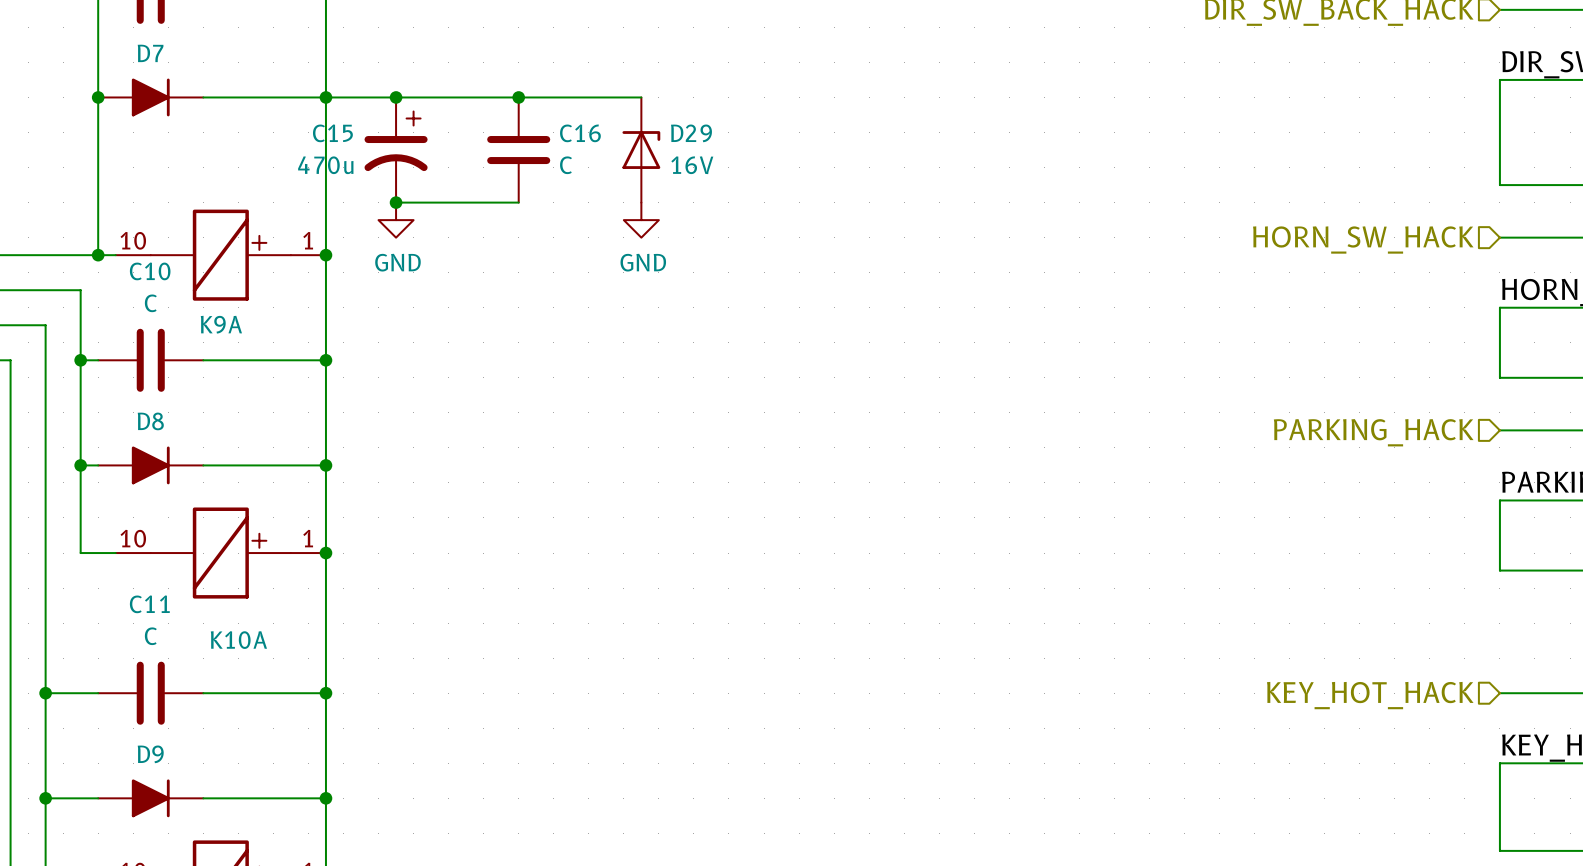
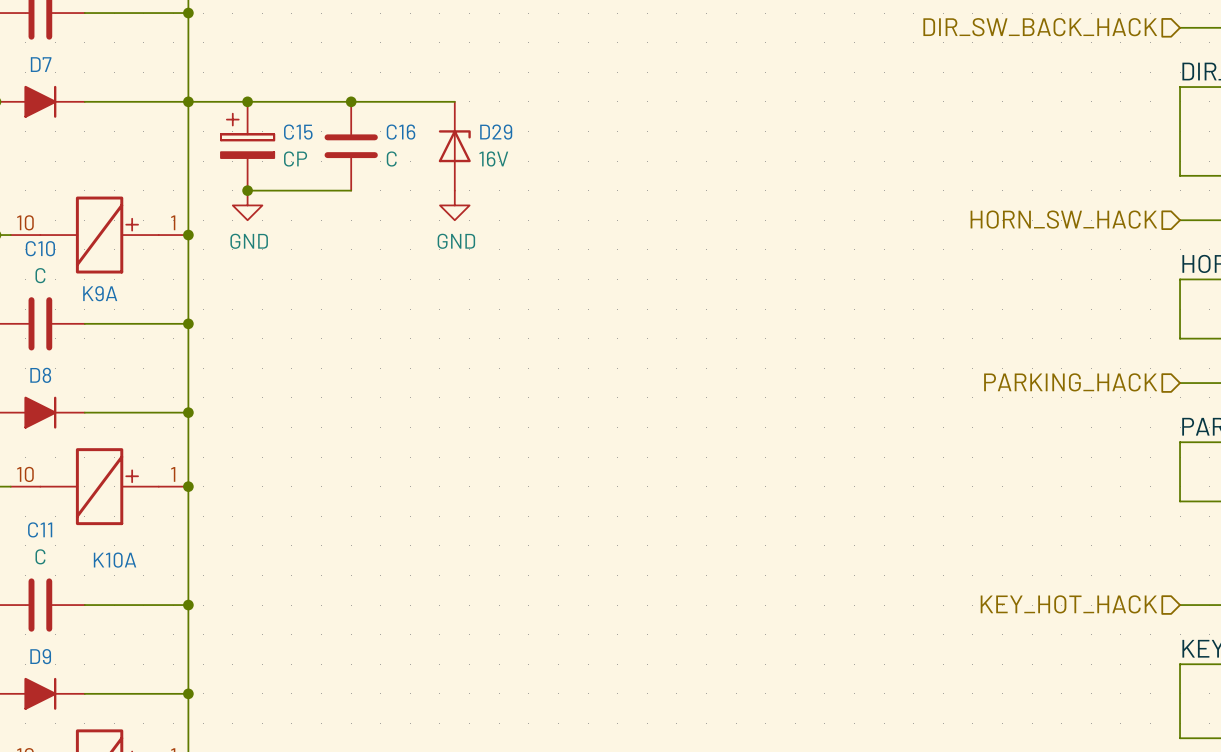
C15 symbol: [364, 97, 428, 203] -> [220, 101, 275, 191]
C15 name position: C15 (332, 133) -> C15 (298, 132)
C15 value: 470u (325, 165) -> CP (295, 159)

